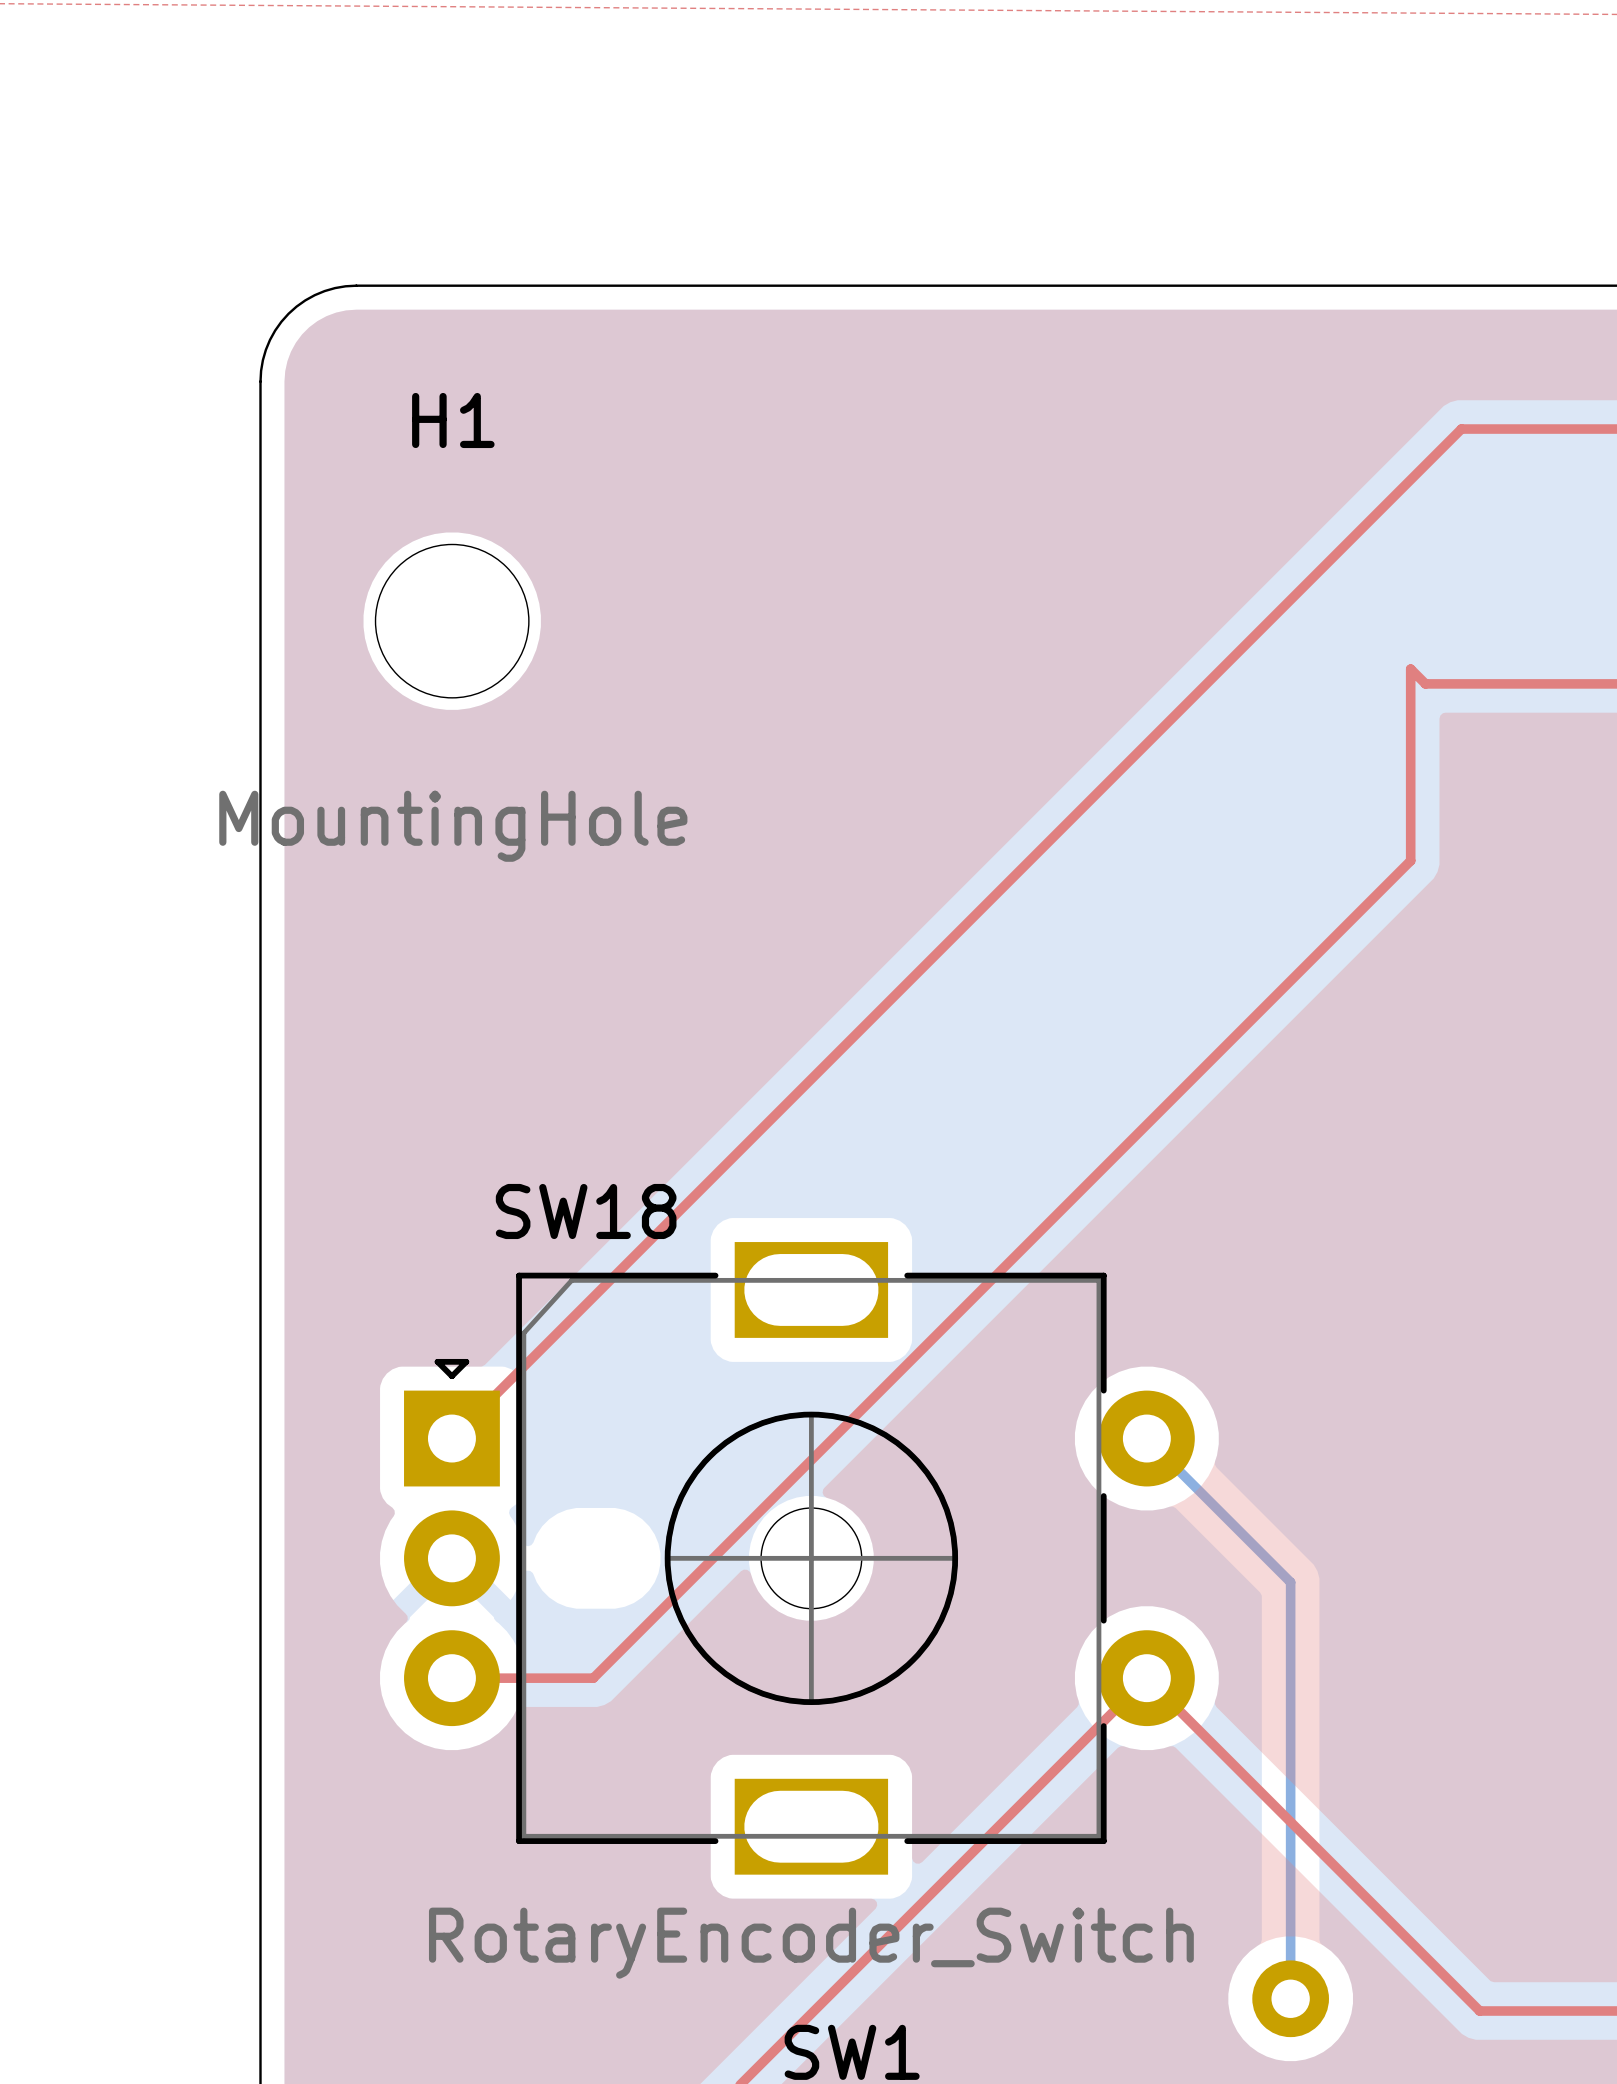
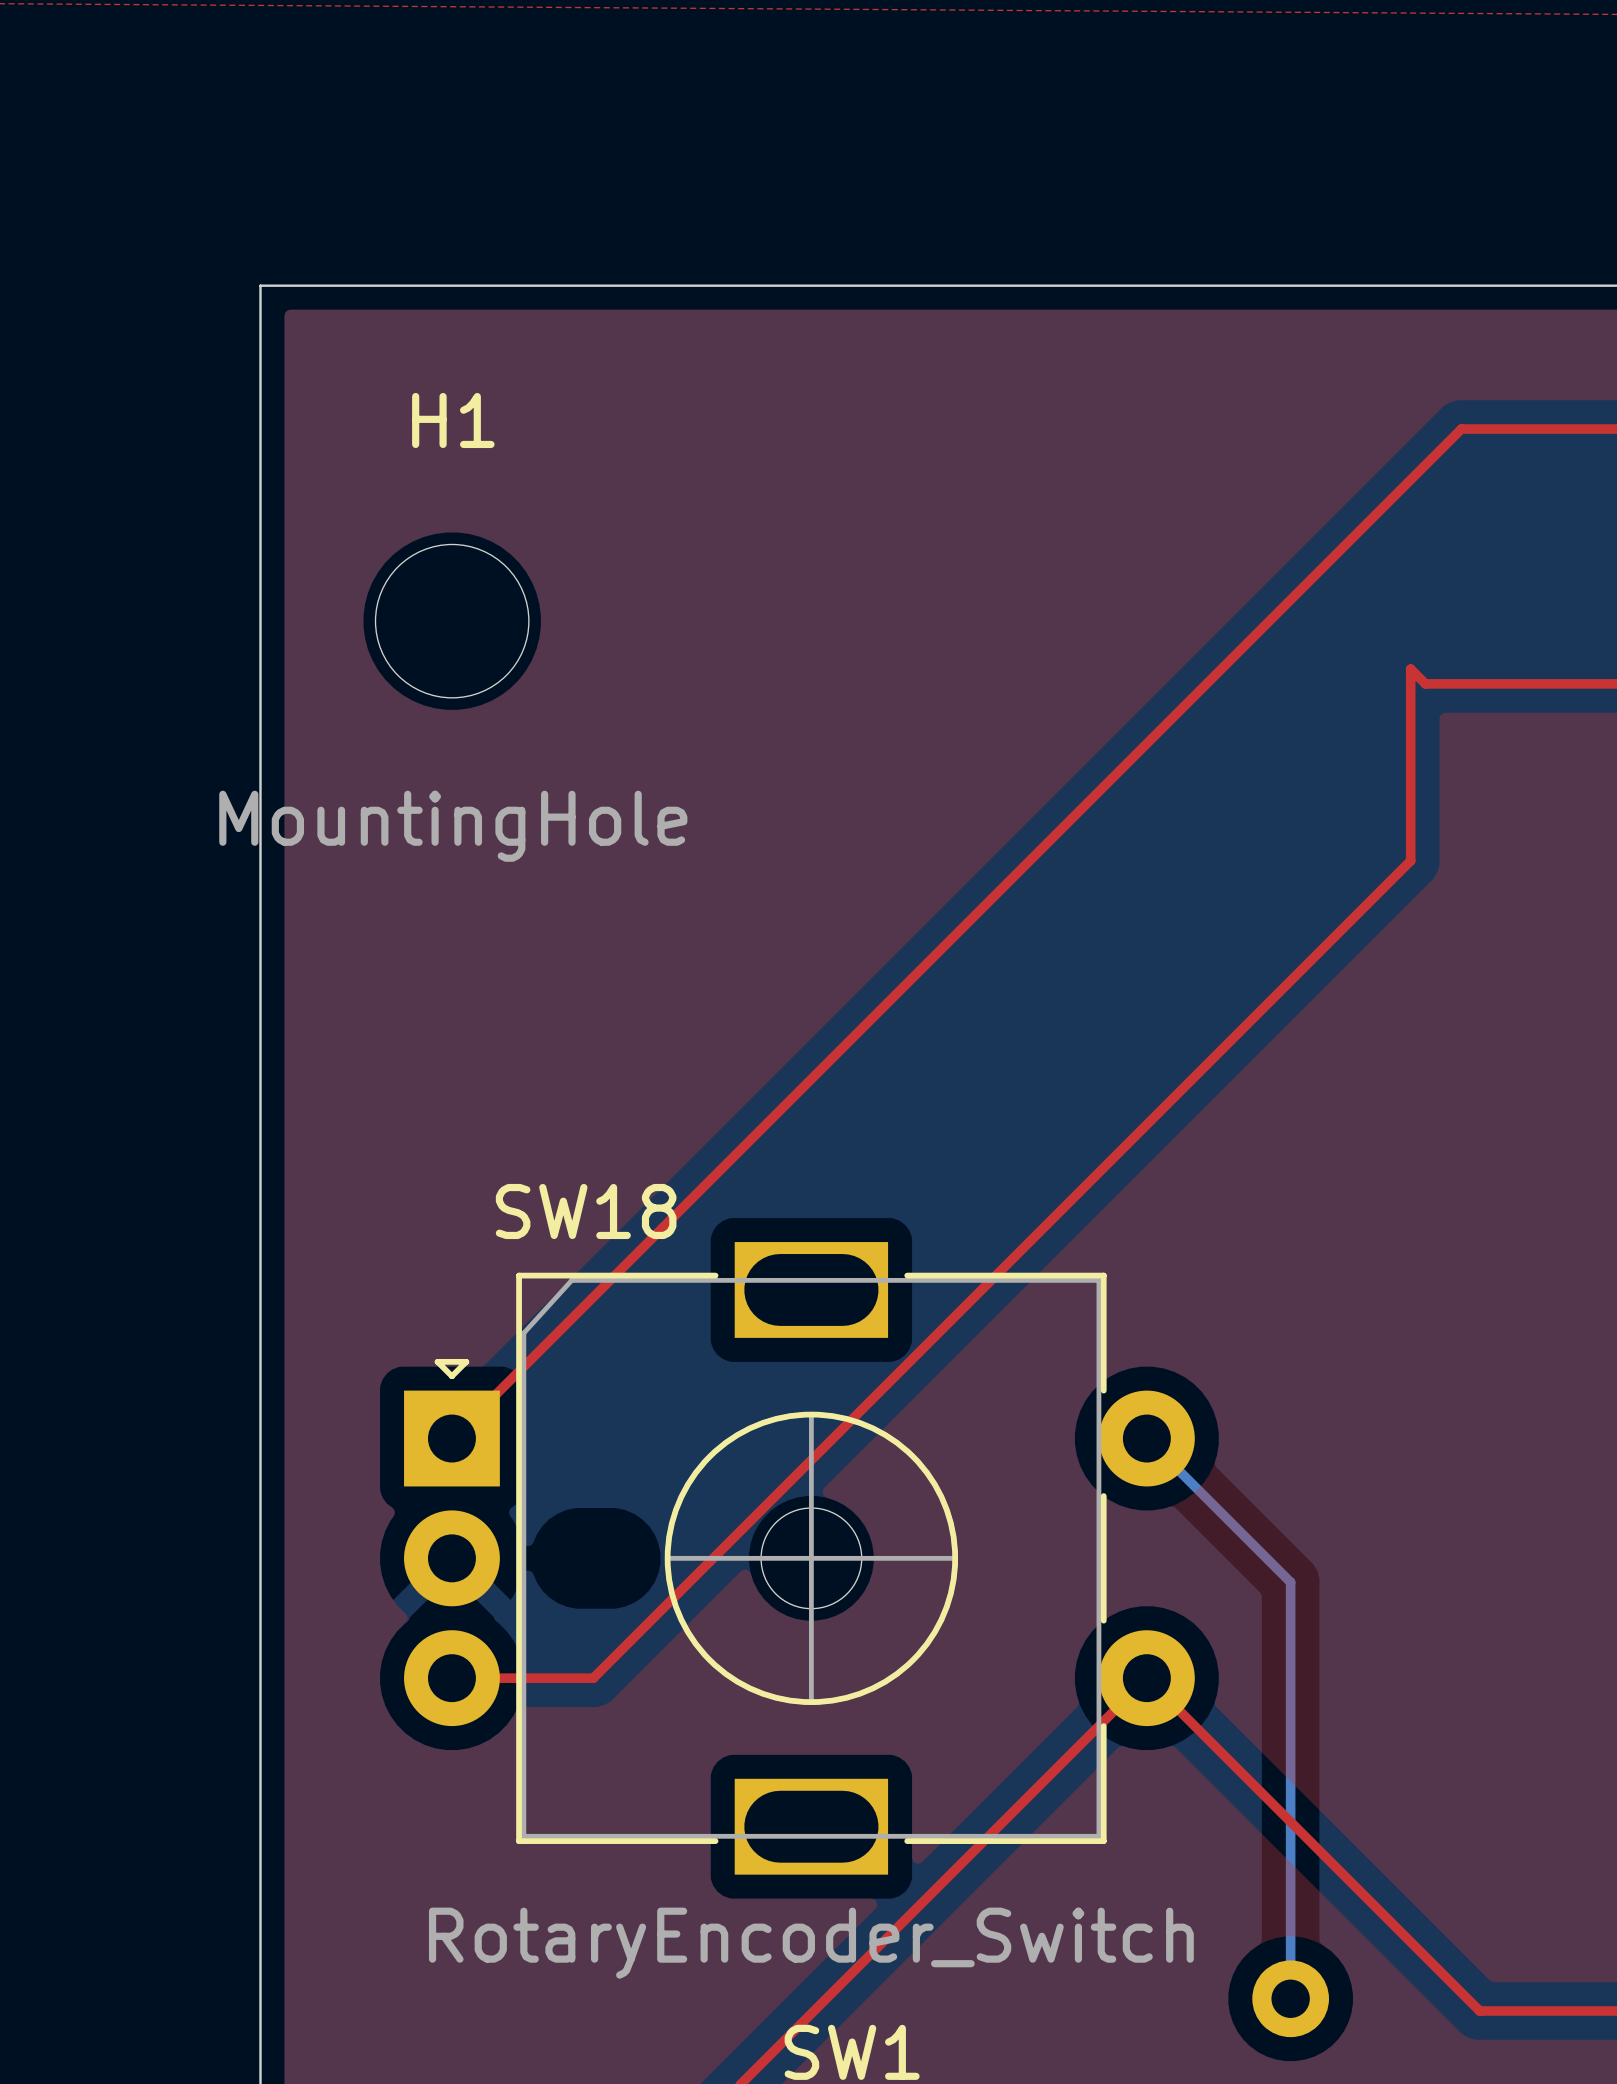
board edge: (356, 285) (324, 291) (305, 300) (288, 313) (275, 330) (265, 349) (260, 381) -> (356, 285) (260, 285) (260, 381)

